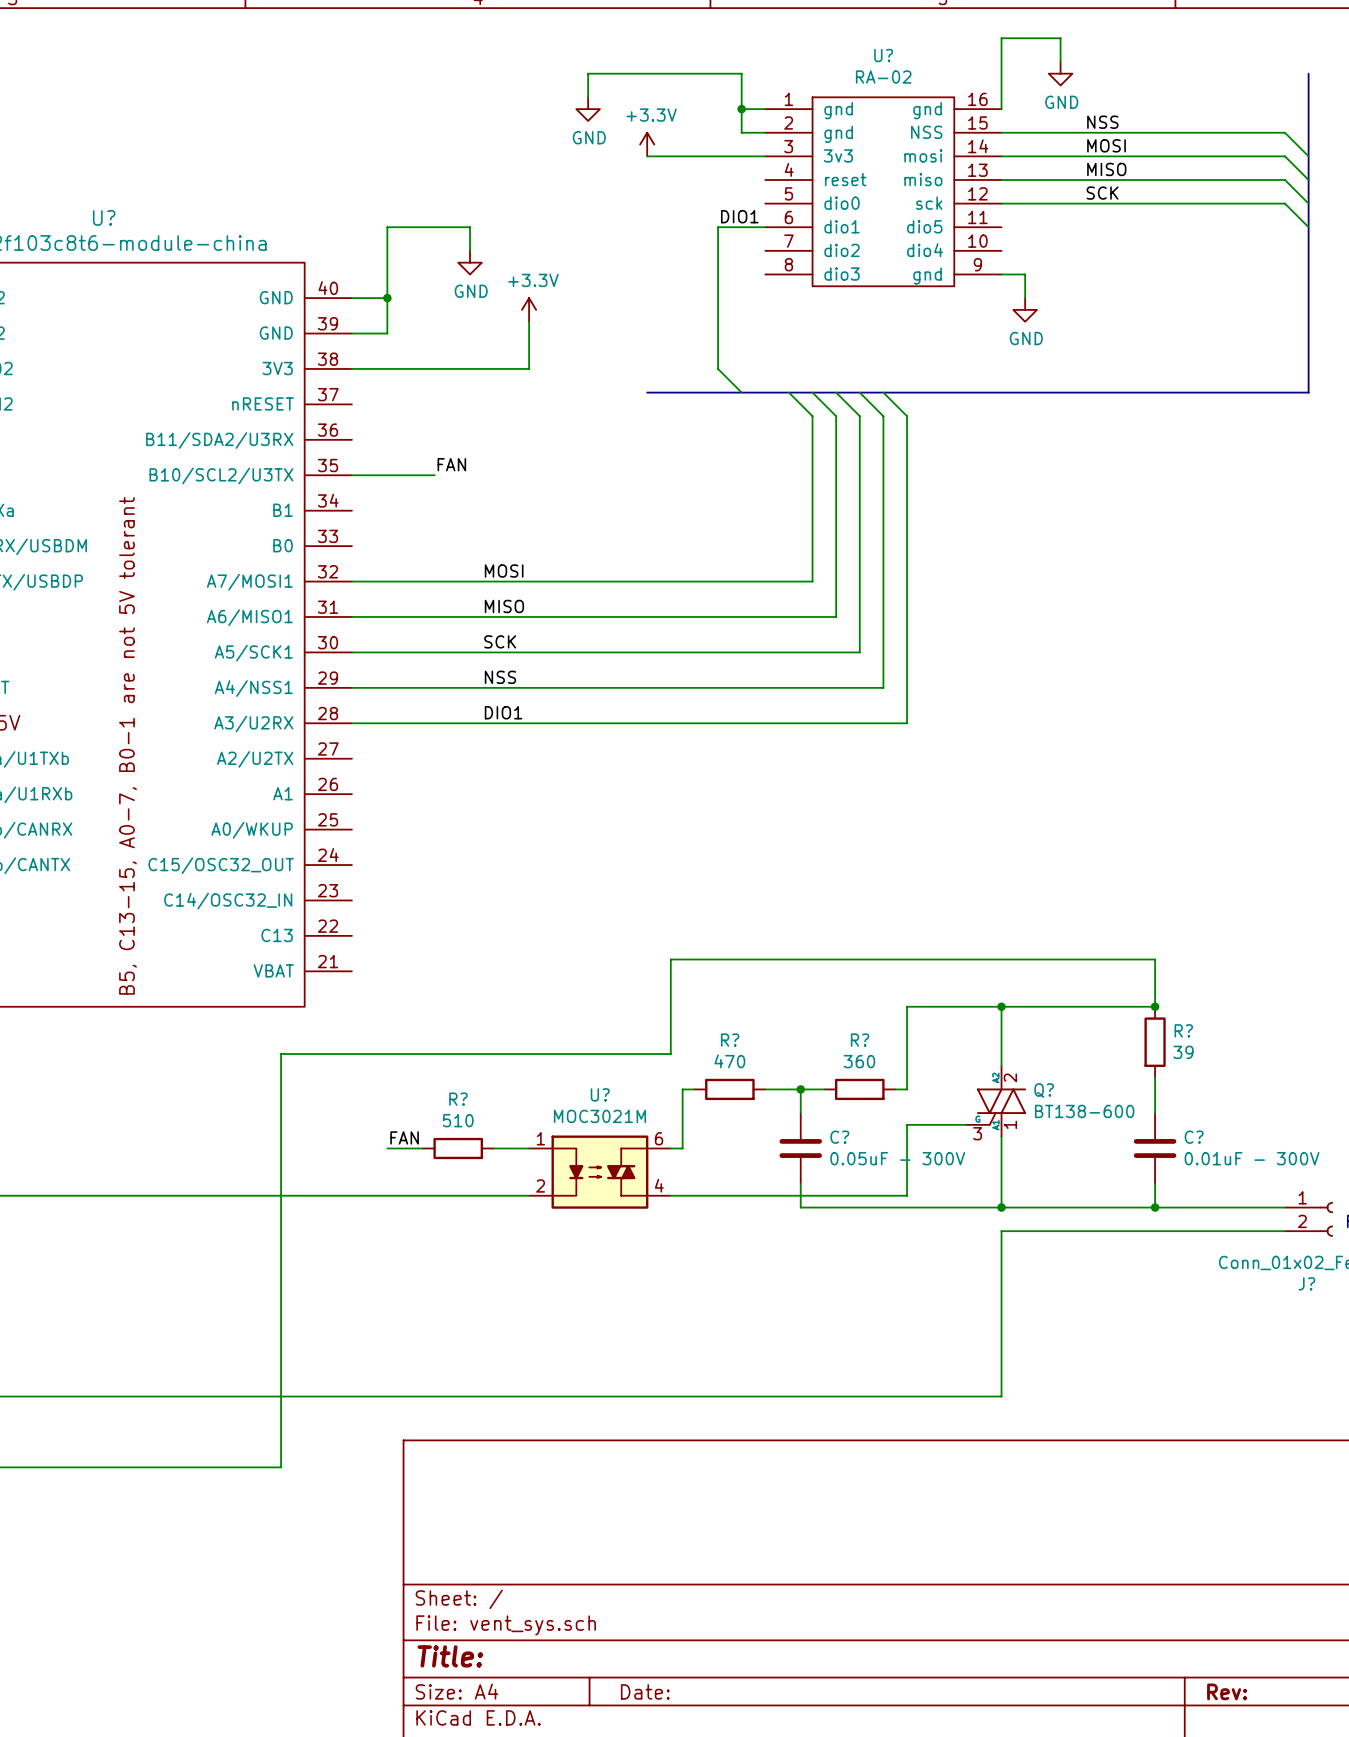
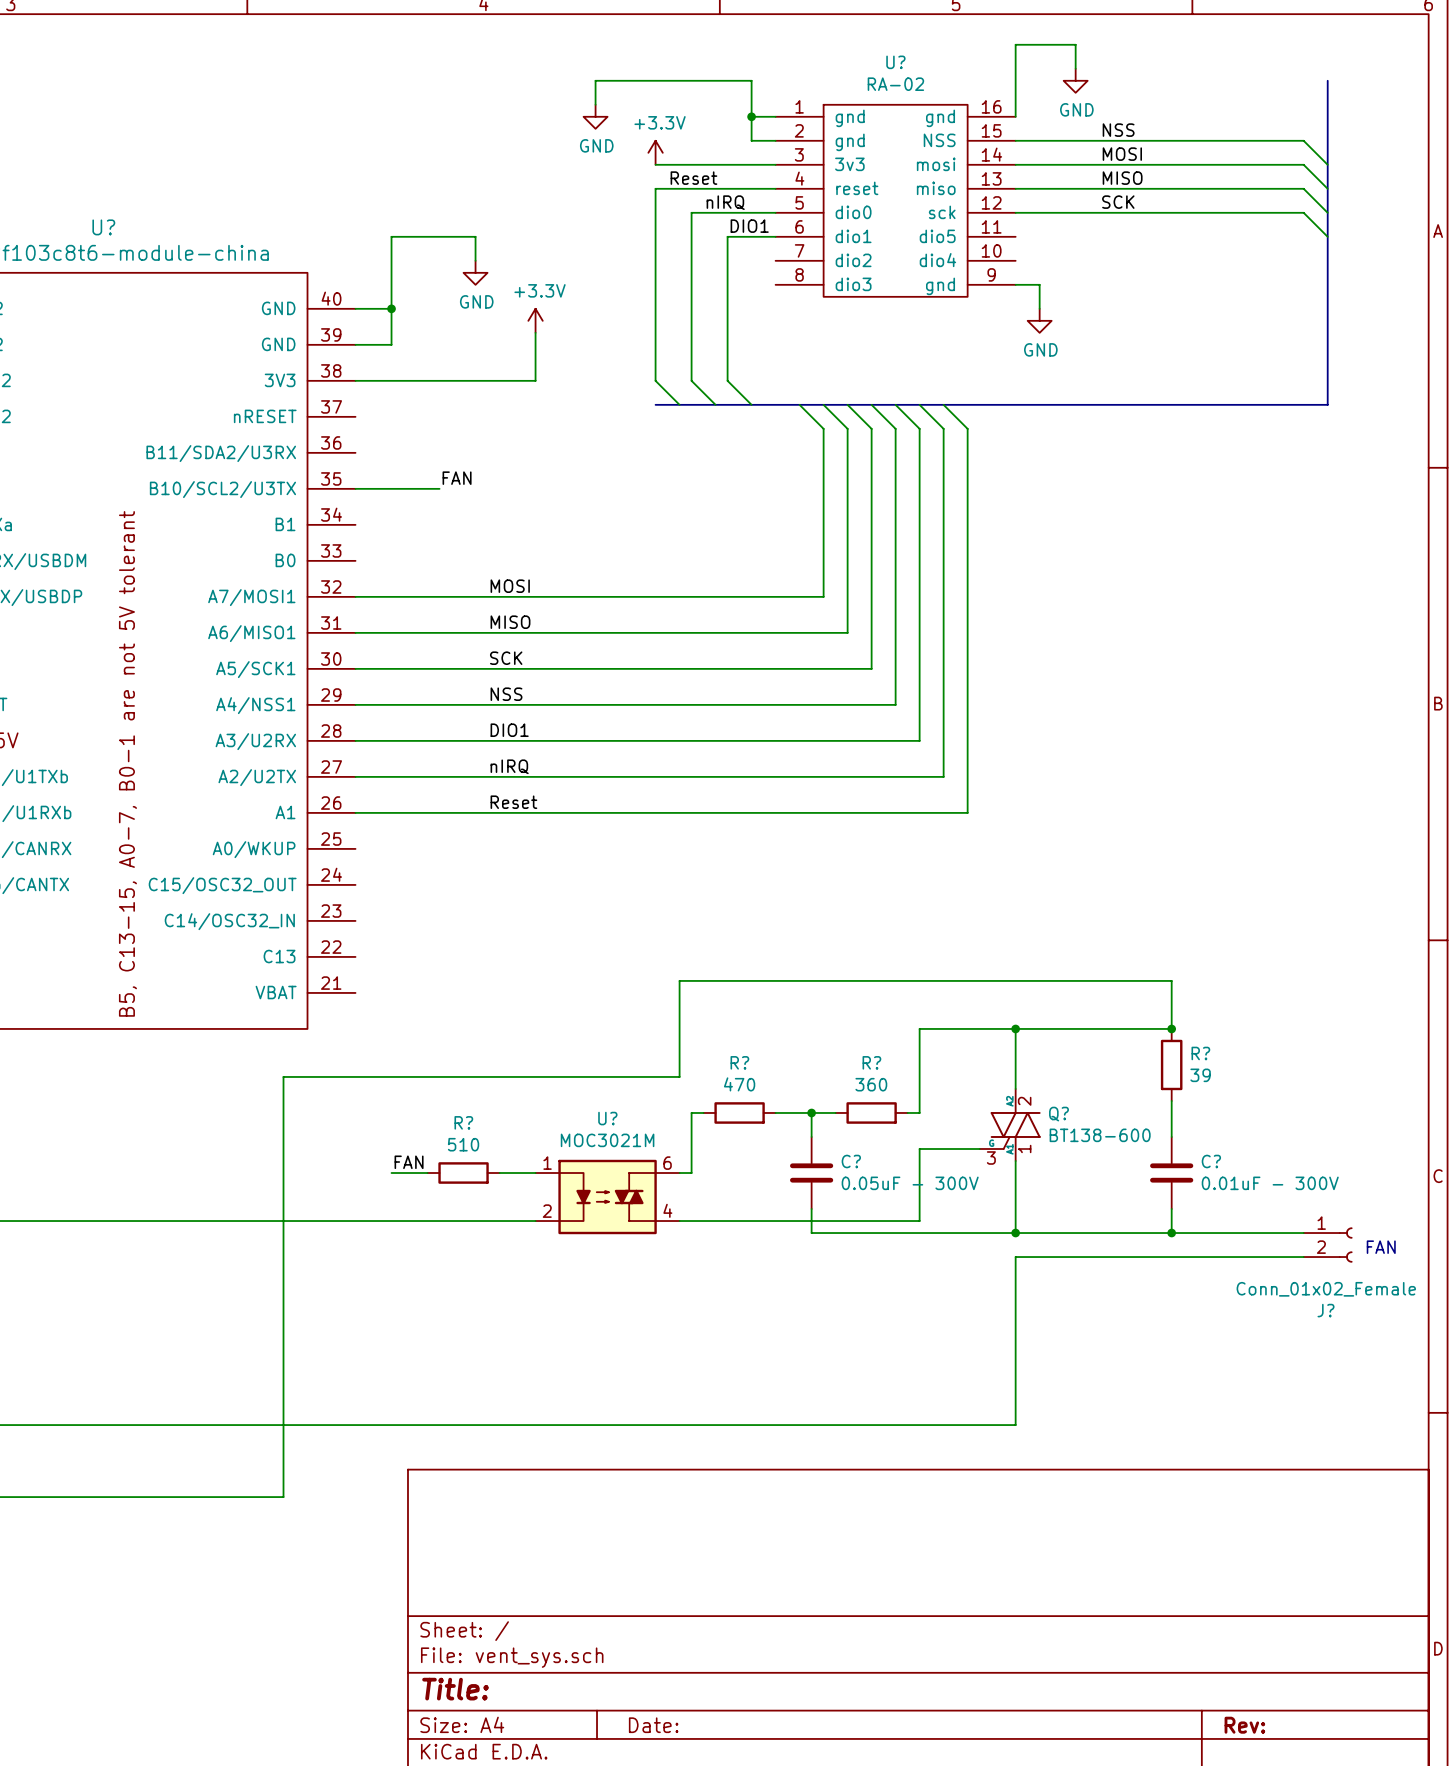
label: none -> Reset (693, 178)
wire: none -> (775, 188) (655, 188) (655, 380) (679, 404)
label: none -> nIRQ (725, 202)
wire: none -> (775, 212) (691, 212) (691, 380) (715, 404)
wire: none -> (919, 404) (943, 428) (943, 776) (355, 776)
wire: none -> (943, 404) (967, 428) (967, 812) (355, 812)
label: none -> nIRQ (509, 766)
label: none -> Reset (513, 802)

